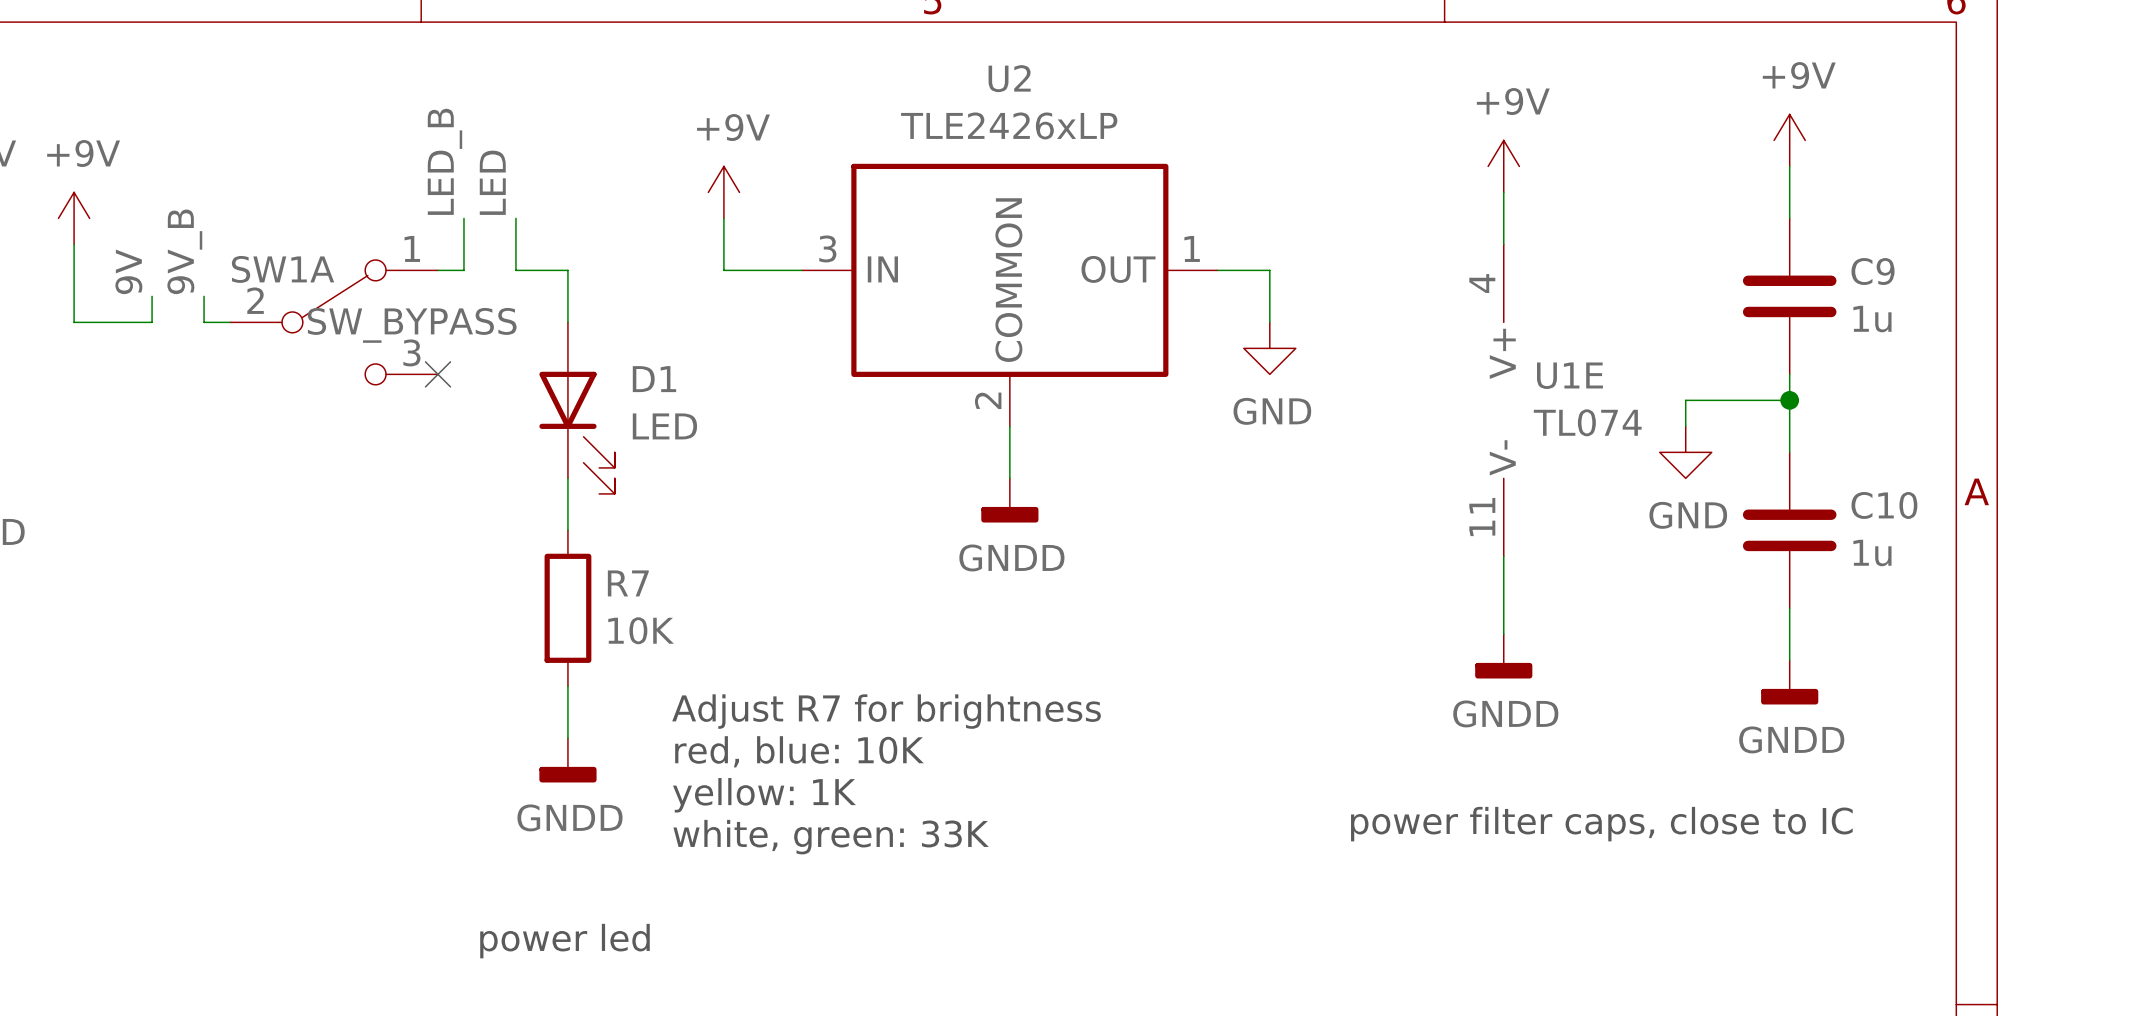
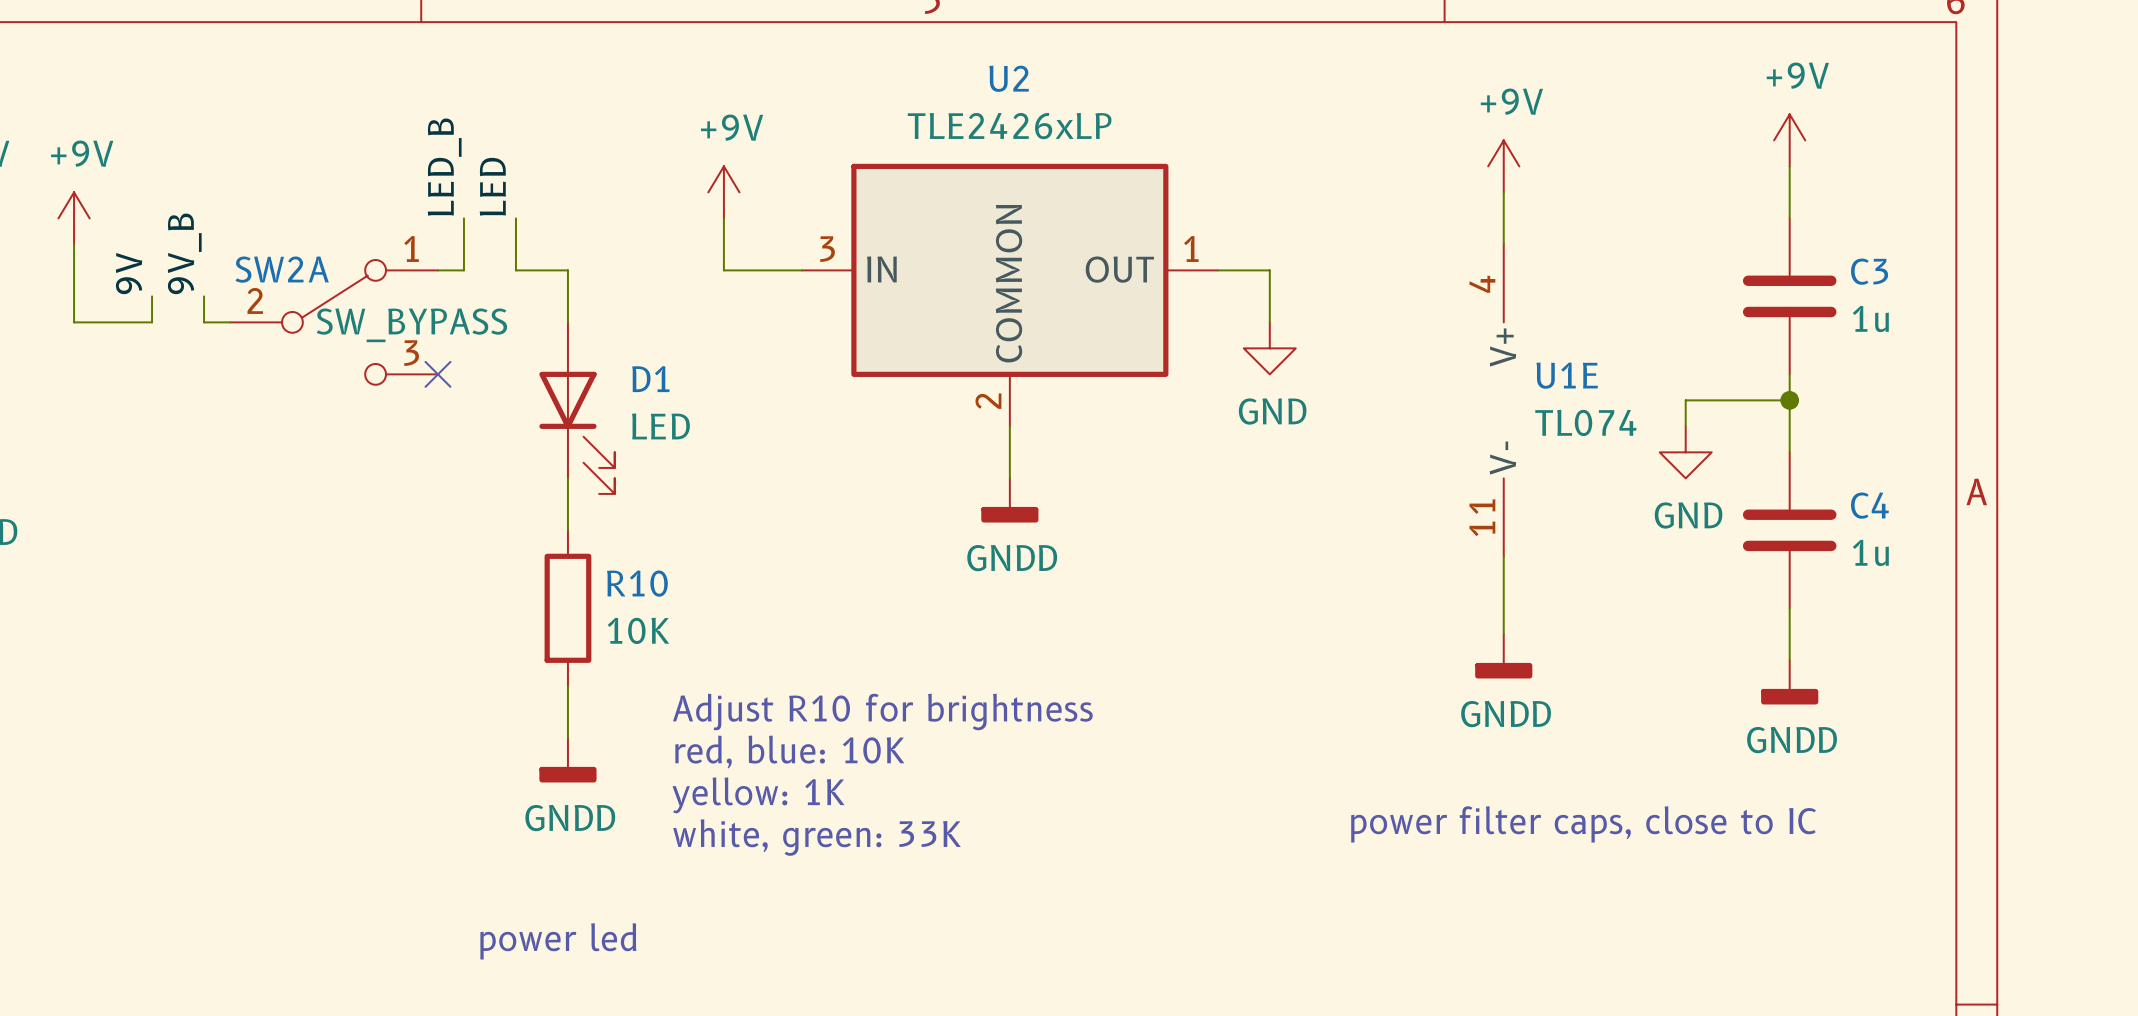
SW1A name: SW1A (283, 269) -> SW2A (282, 269)
C9 name: C9 (1873, 271) -> C3 (1869, 271)
C10 name: C10 (1884, 505) -> C4 (1869, 505)
R7 name: R7 (628, 583) -> R10 (637, 583)
text: Adjust R7 for brightness (886, 711) -> Adjust R10 for brightness (882, 711)

